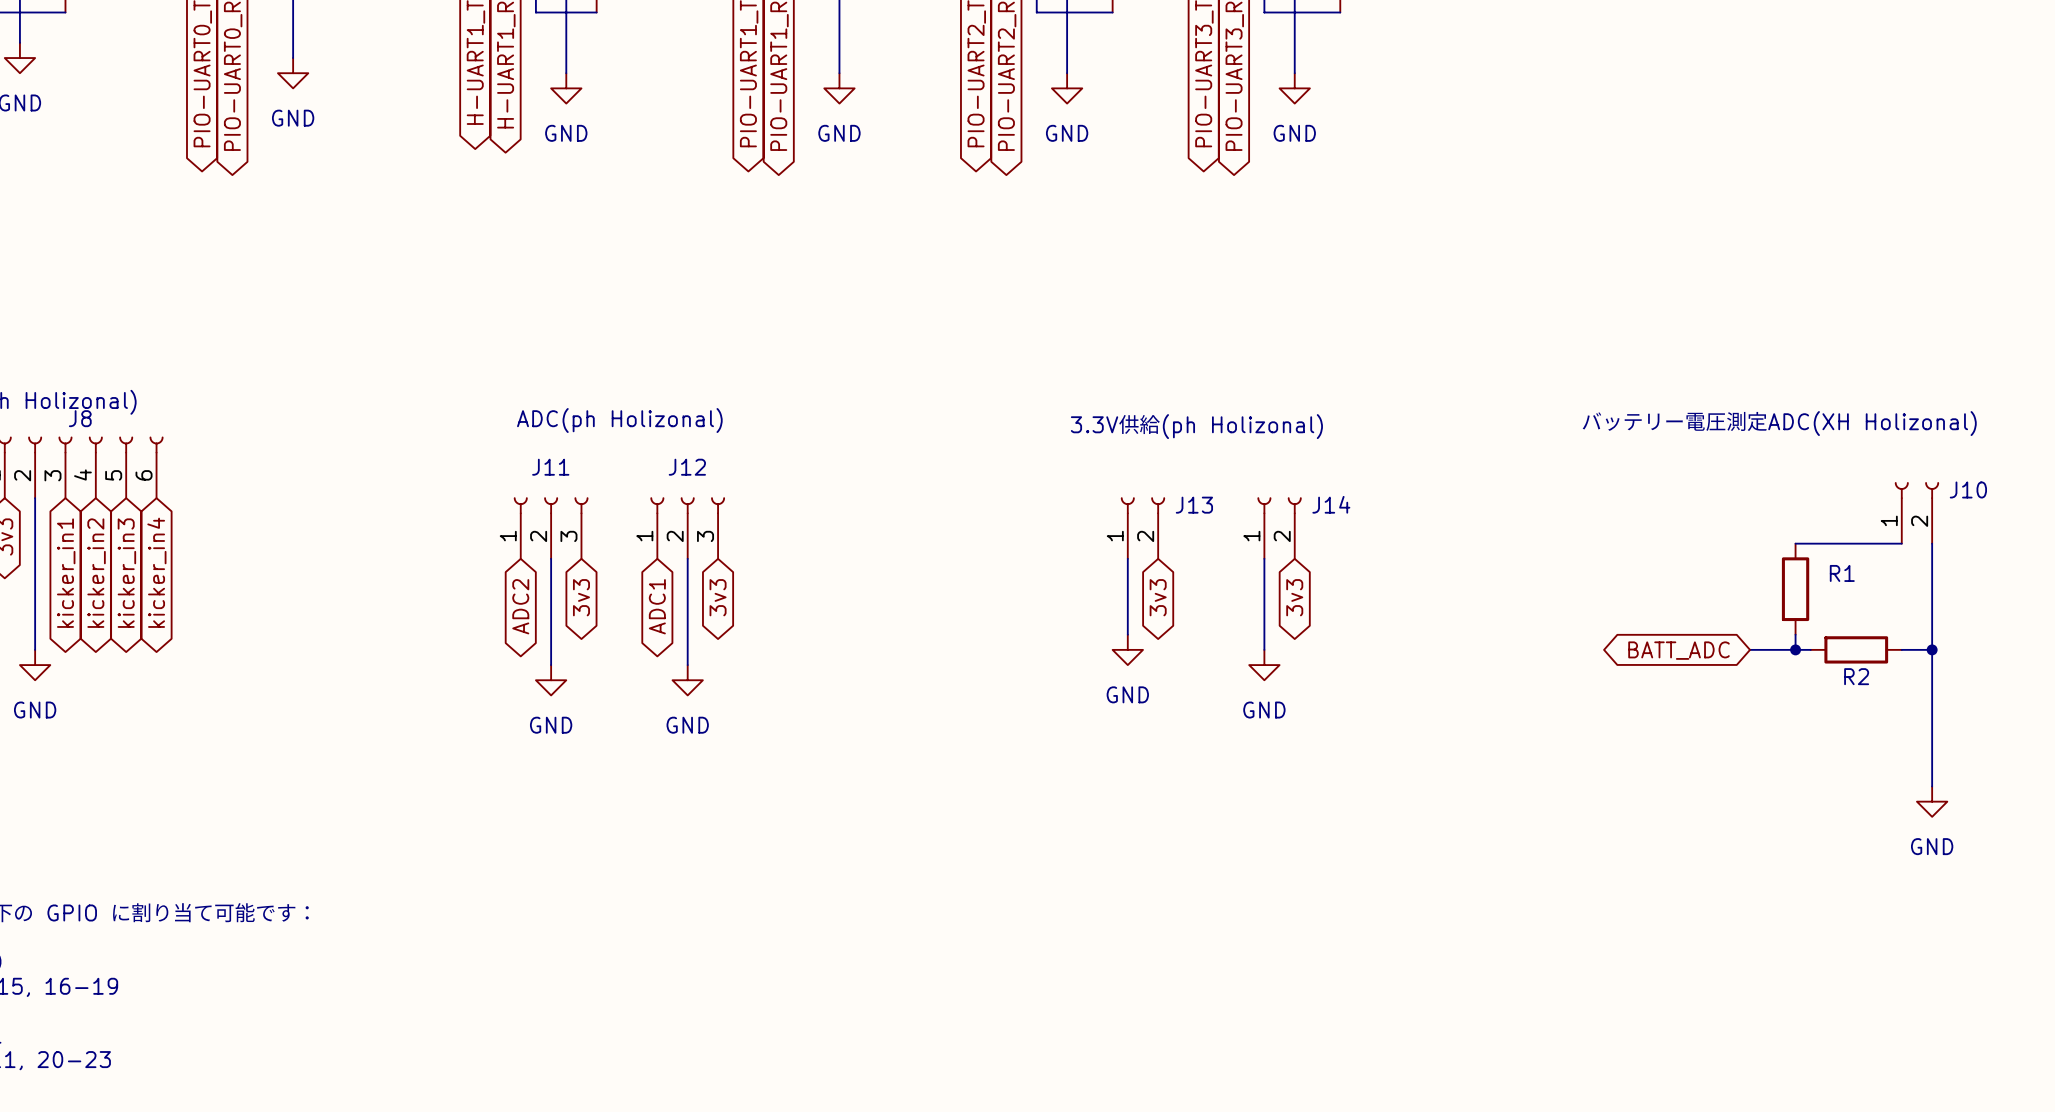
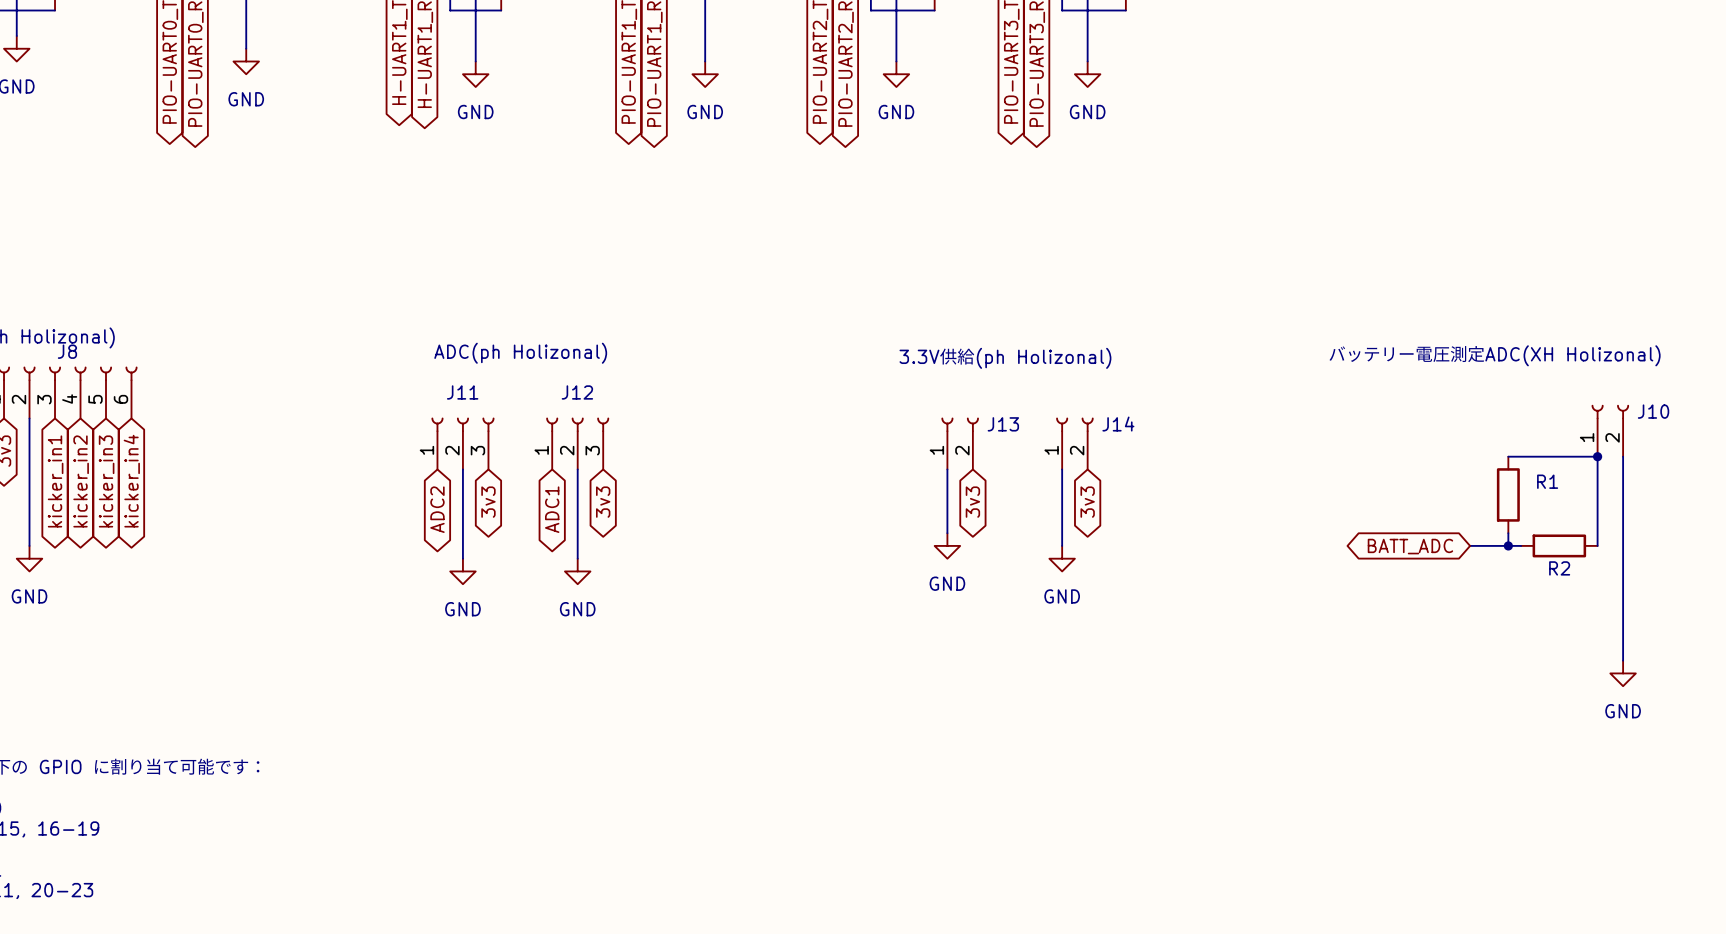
junction: none -> (1597, 456)
wire: (1901, 649) (1932, 649) -> (1597, 545) (1597, 456)
junction: (1932, 649) -> none

